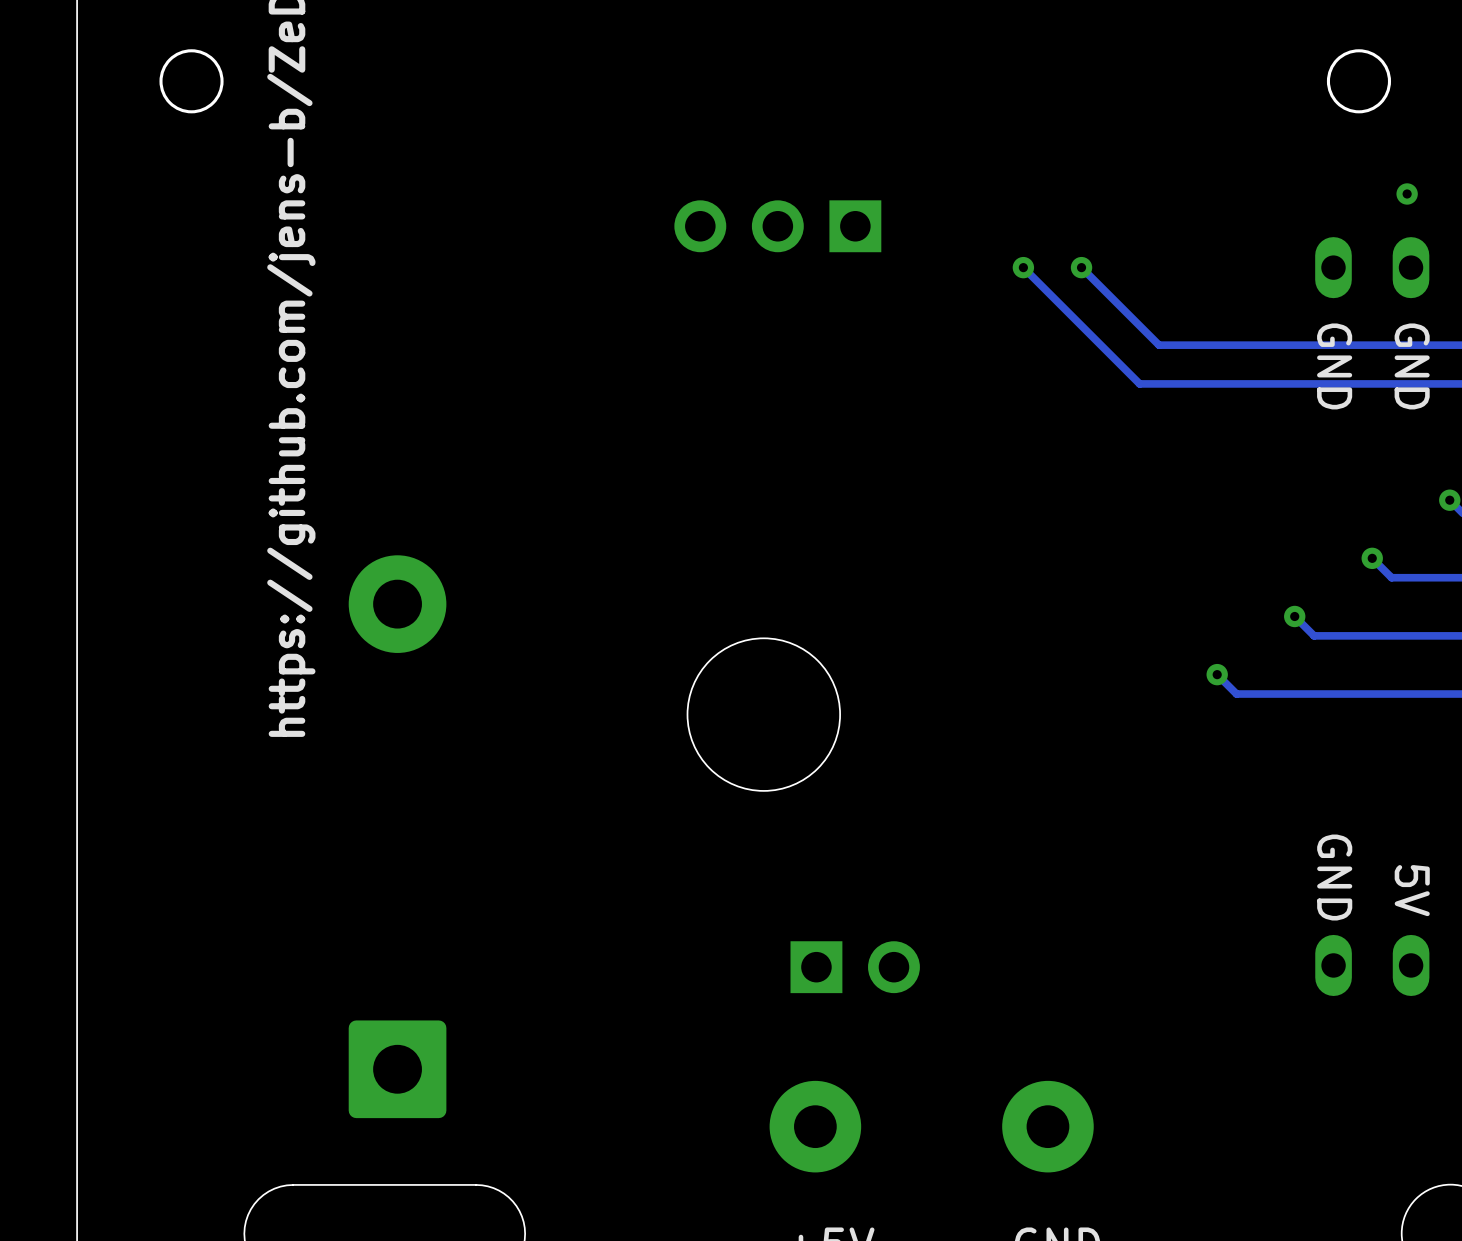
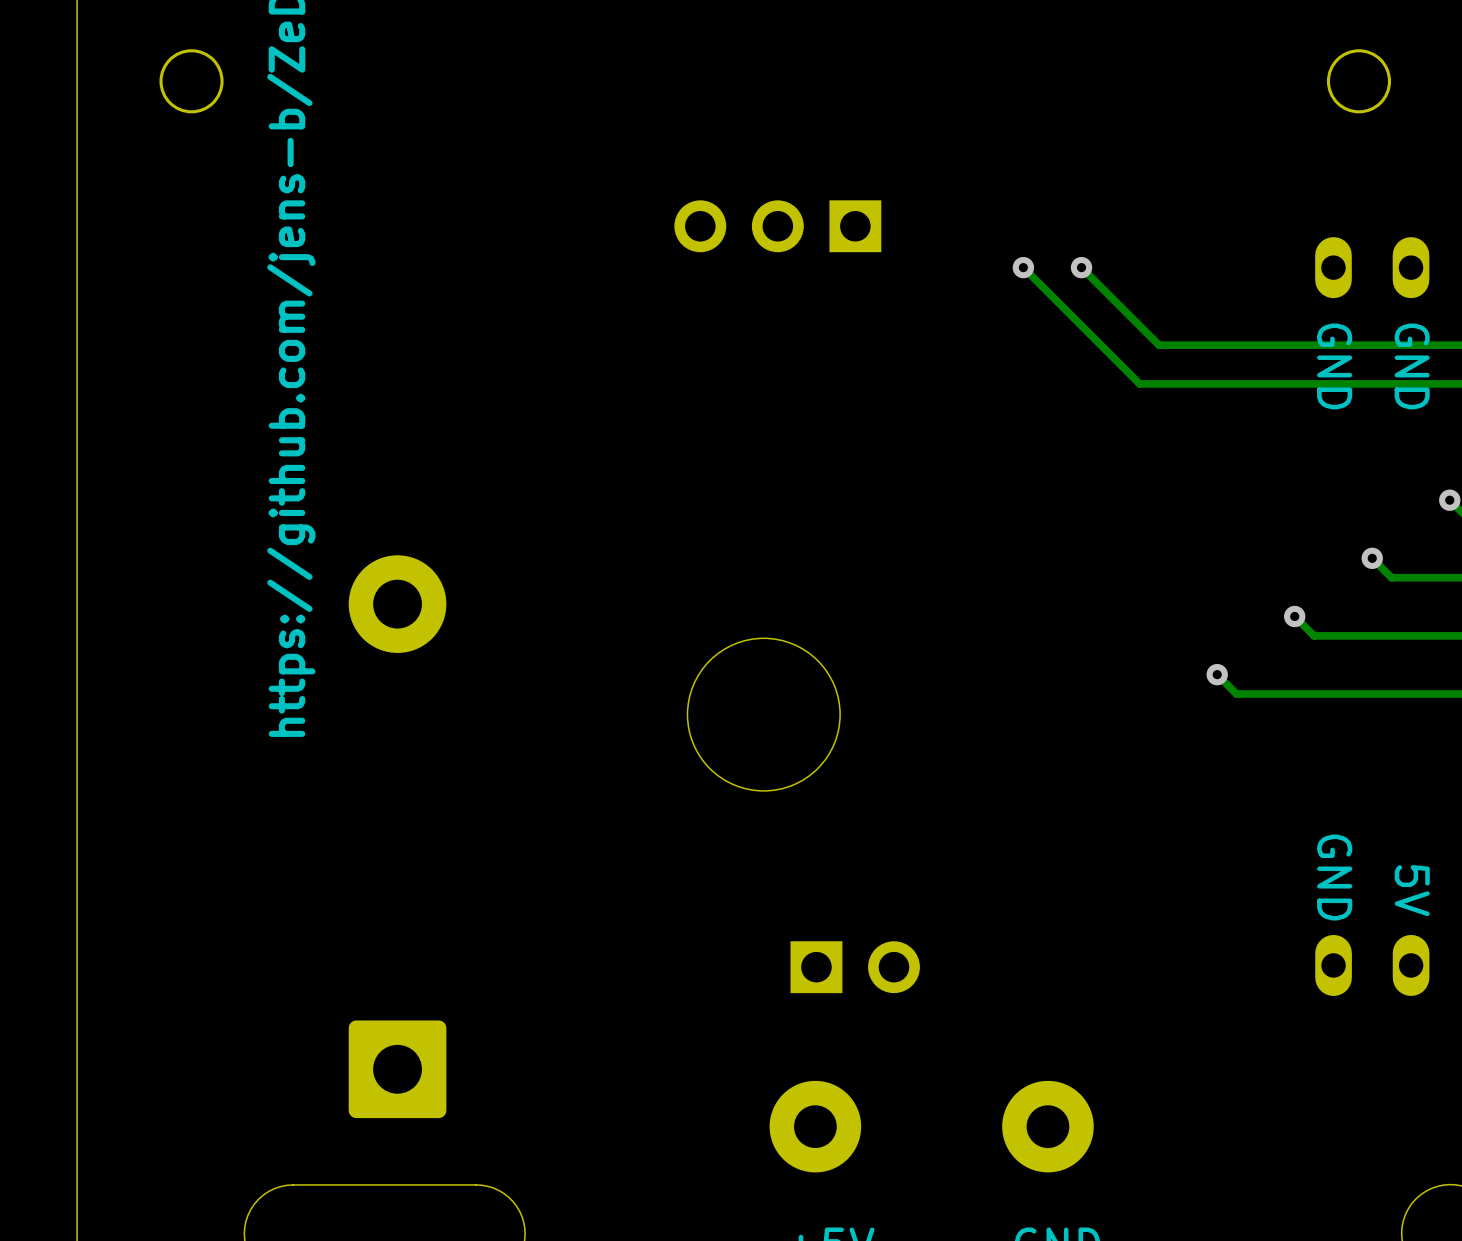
via: (1407, 193) -> none

